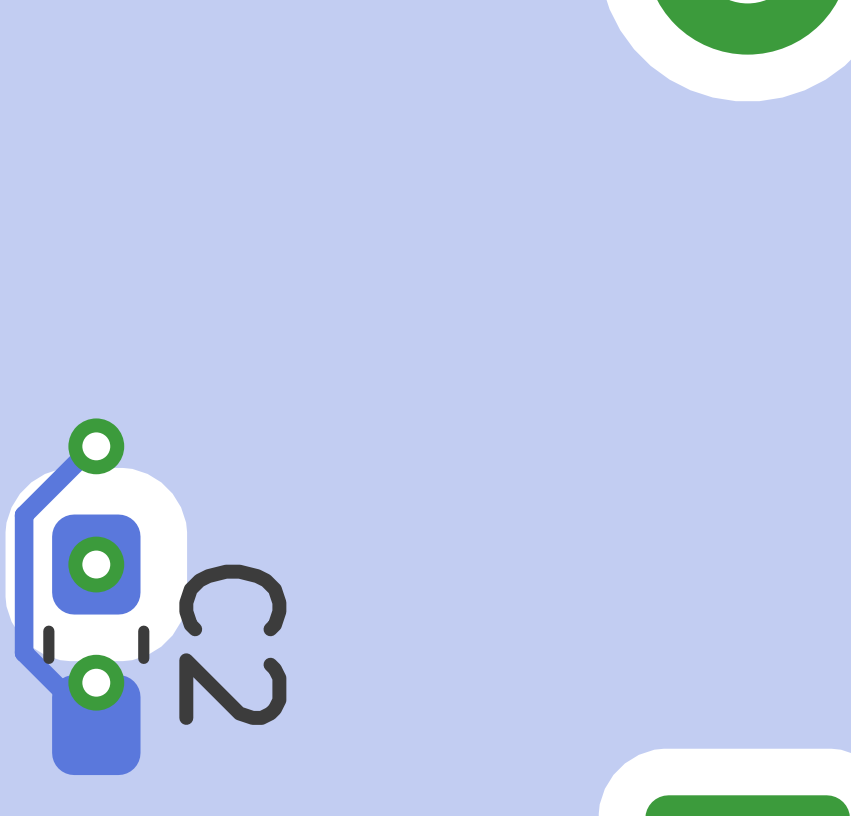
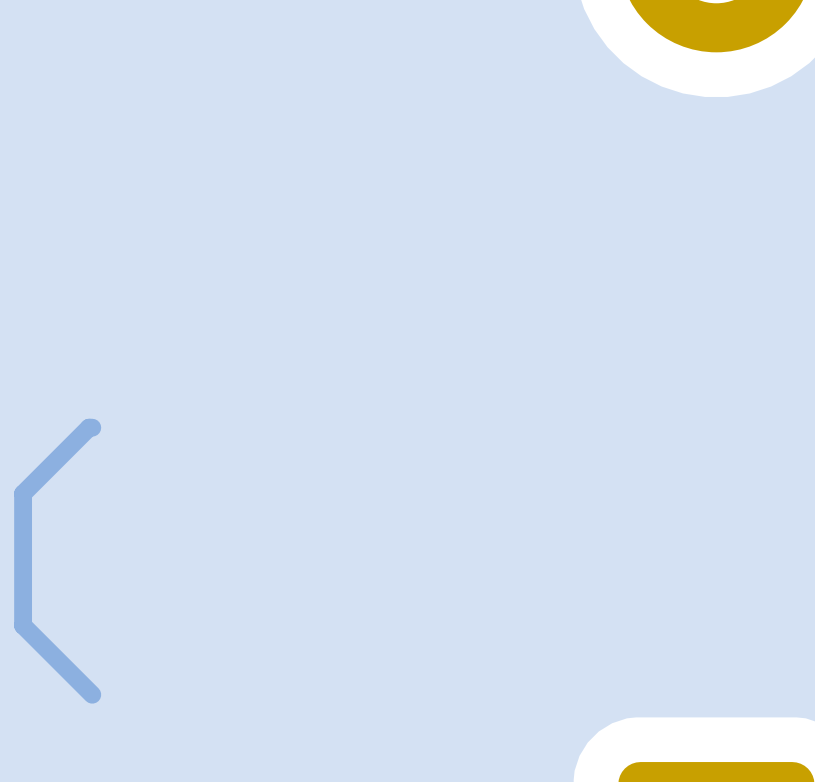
via: (96, 446) -> none
via: (96, 564) -> none
C2: (96, 644) -> none
via: (96, 682) -> none

